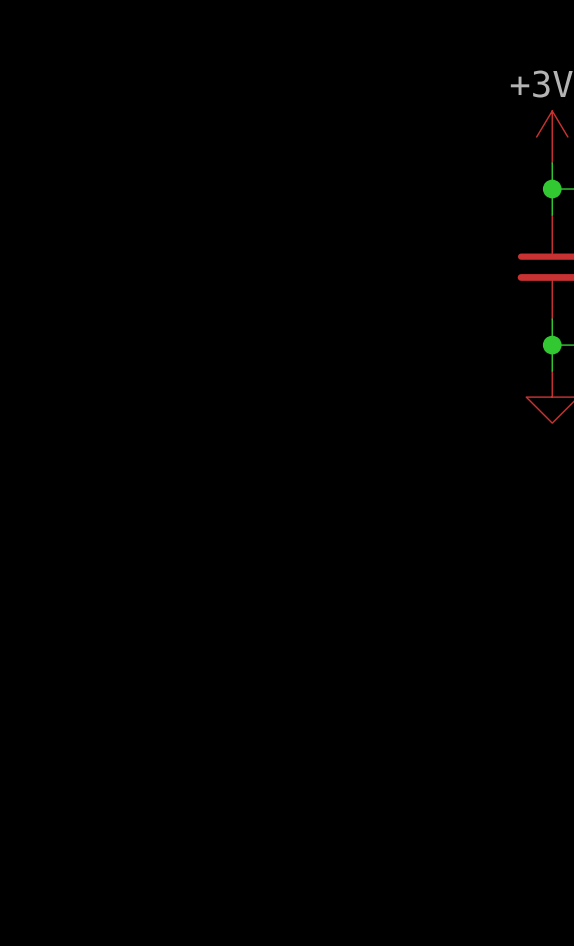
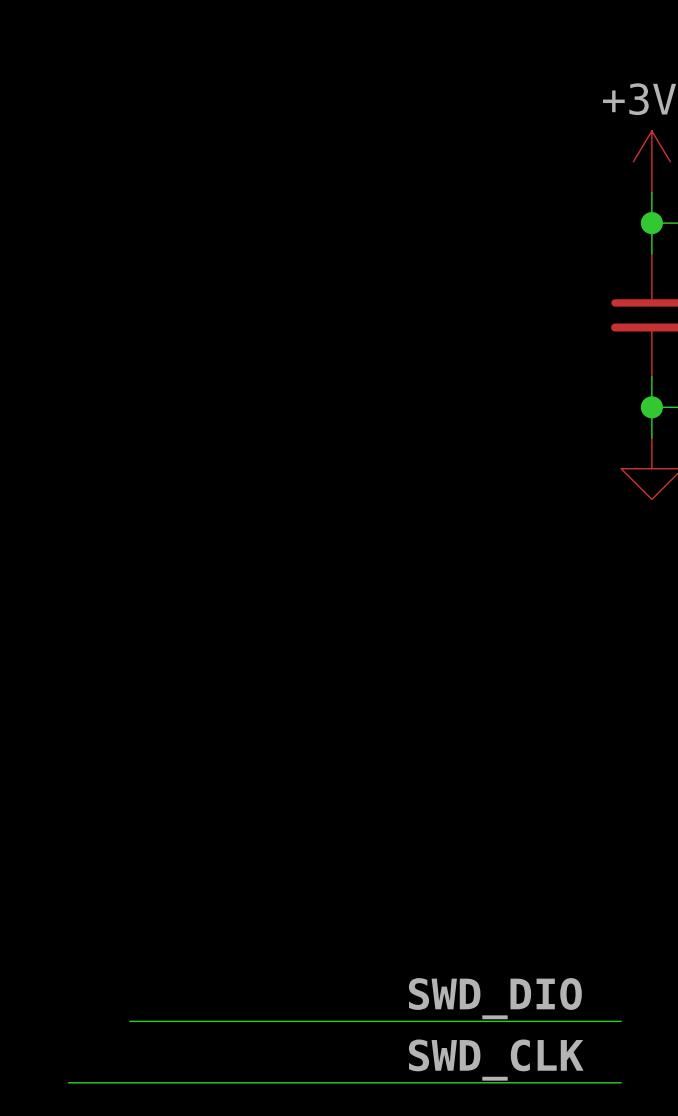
label: none -> SWD_DIO (495, 998)
wire: none -> (129, 1021) (621, 1021)
label: none -> SWD_CLK (496, 1060)
wire: none -> (68, 1082) (621, 1082)

